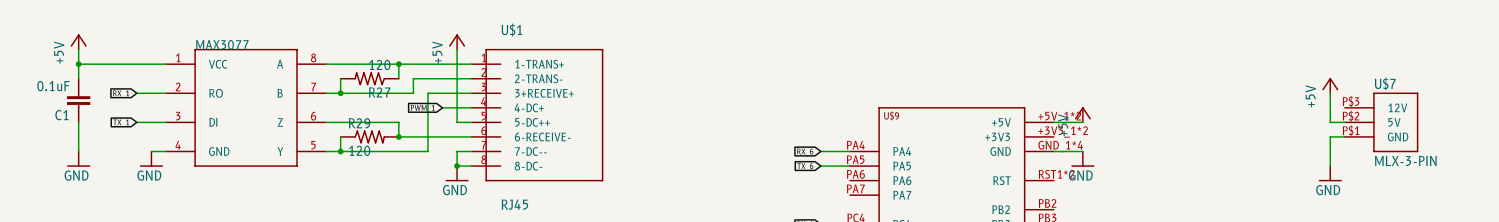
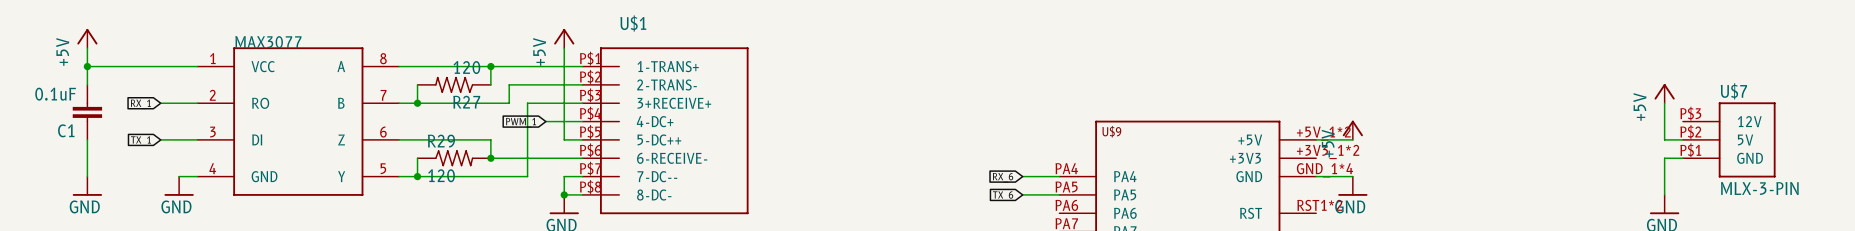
U$1 pin number: 1 (483, 57) -> P$1 (590, 58)
U$1 pin number: 2 (483, 72) -> P$2 (590, 76)
U$1 pin number: 3 (483, 87) -> P$3 (590, 95)
U$1 pin number: 4 (483, 101) -> P$4 (590, 113)
U$1 pin number: 5 (483, 116) -> P$5 (590, 131)
U$1 pin number: 6 (483, 130) -> P$6 (590, 150)
U$1 pin number: 7 (484, 145) -> P$7 (590, 168)
U$1 pin number: 8 (483, 159) -> P$8 (590, 186)

